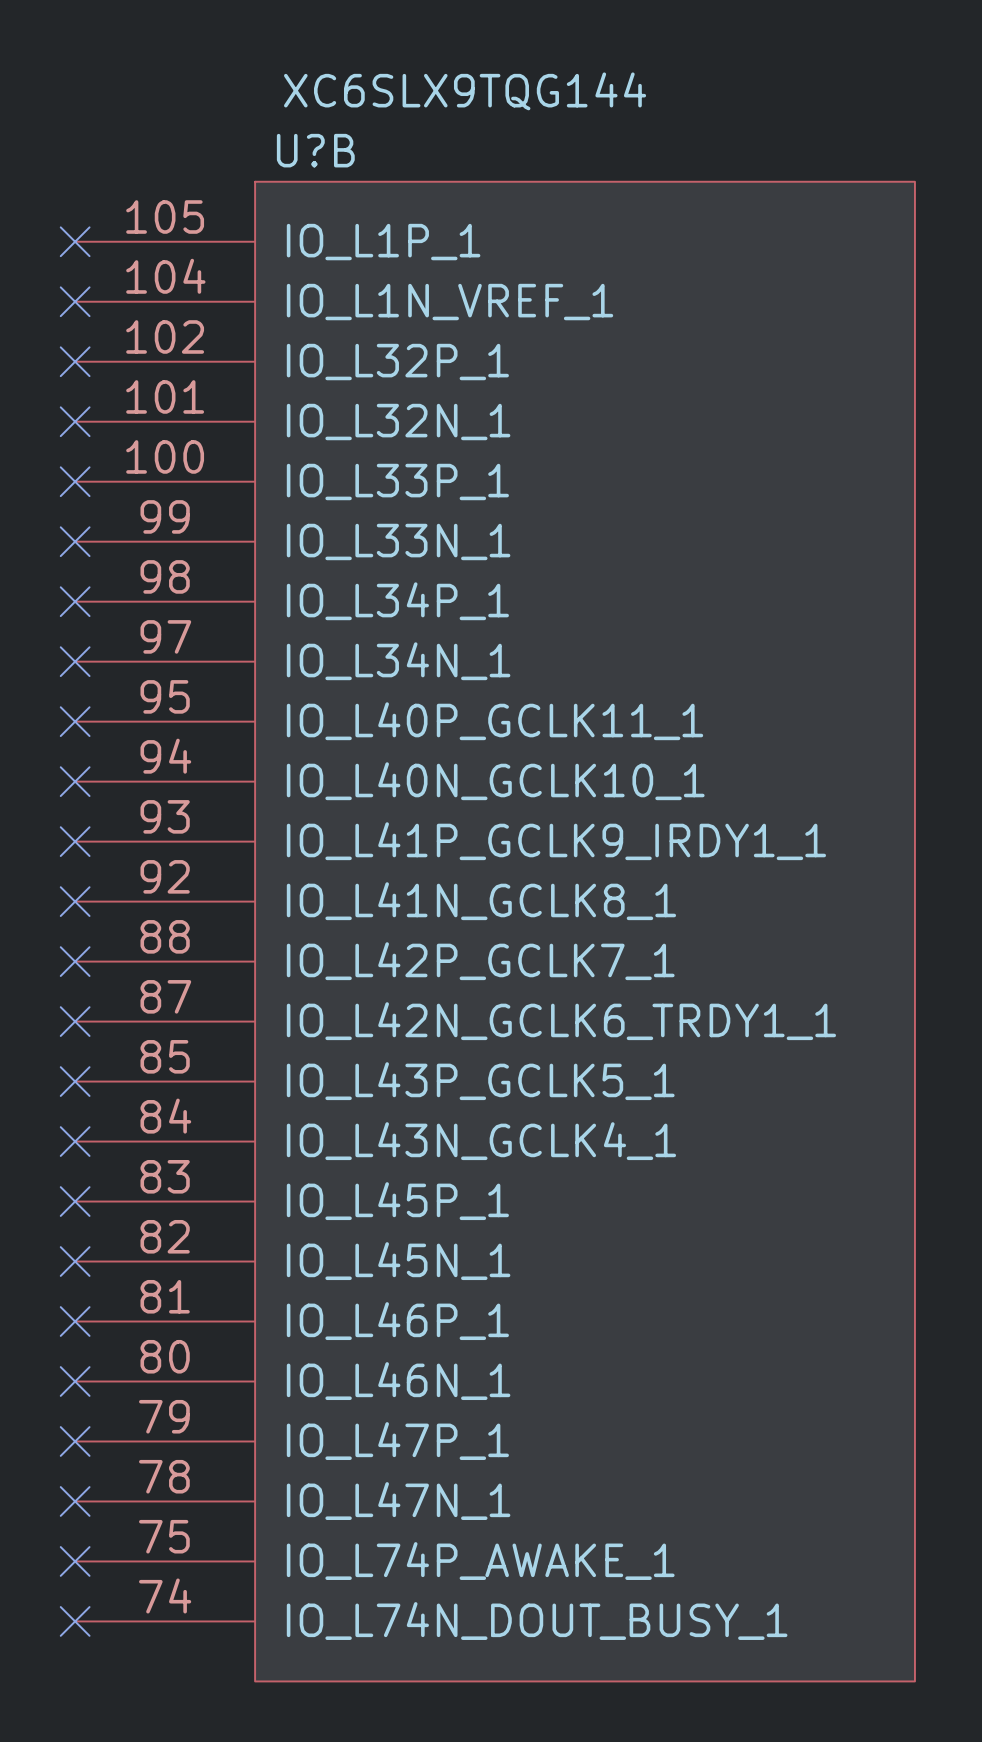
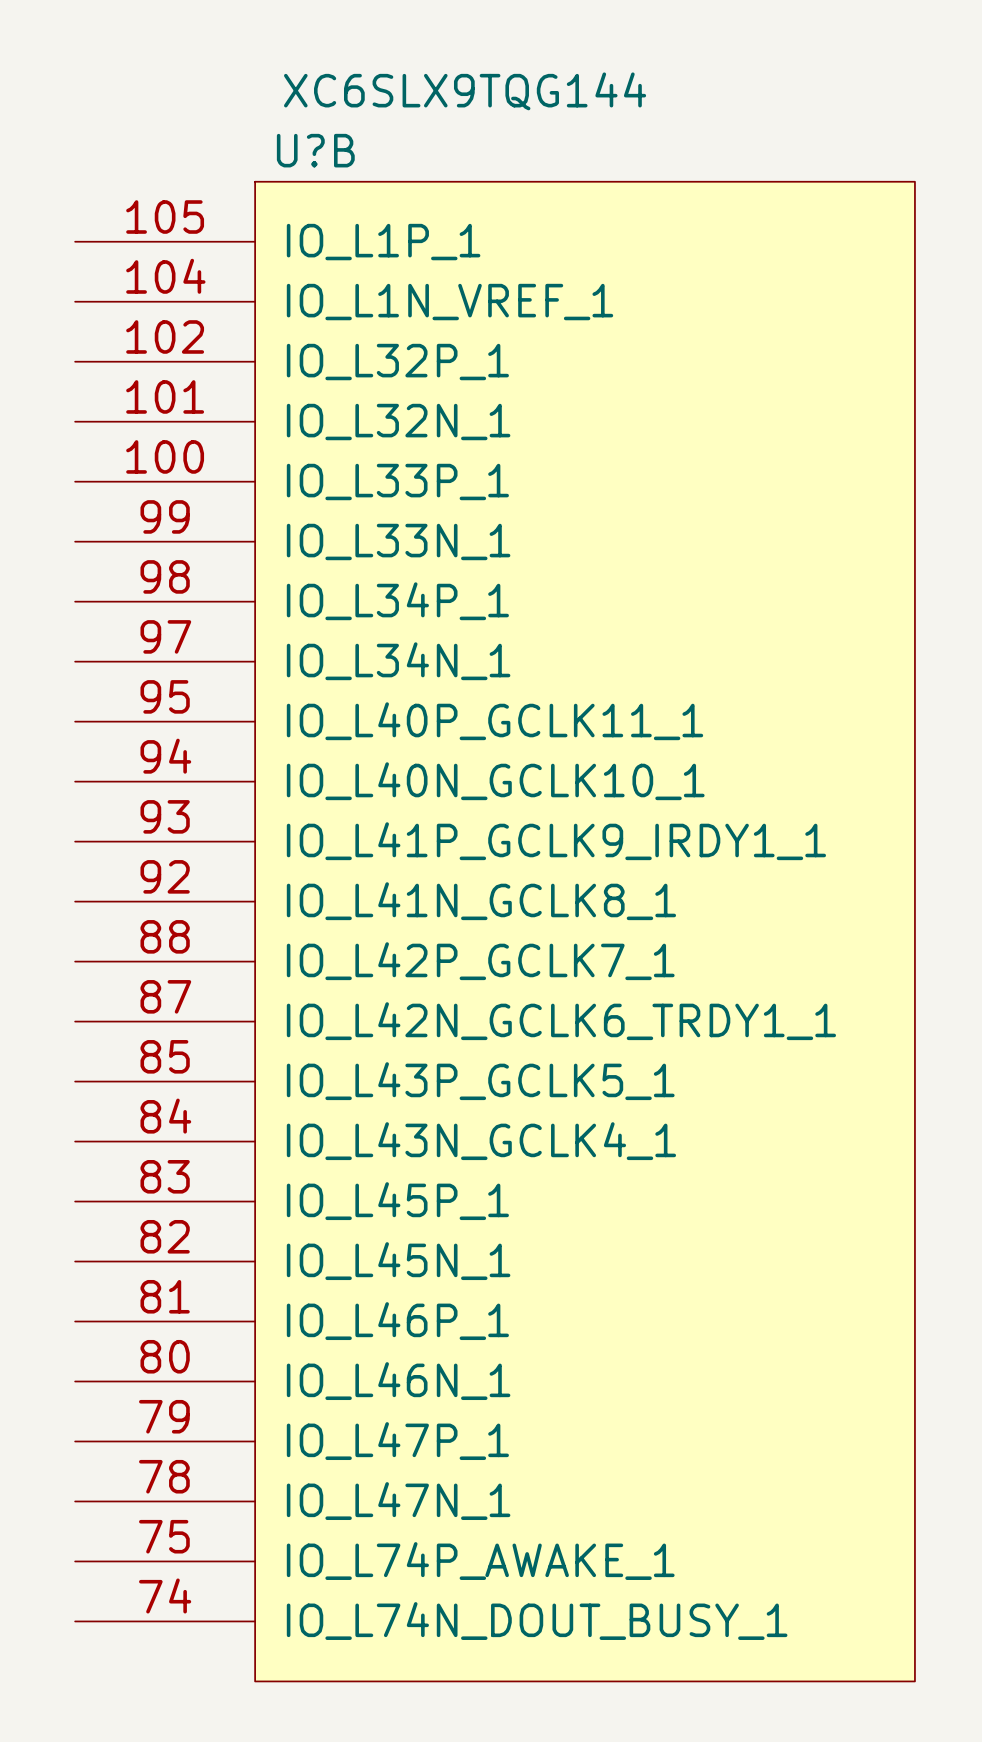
no-connect mark: (75, 241) -> none
no-connect mark: (75, 301) -> none
no-connect mark: (75, 361) -> none
no-connect mark: (75, 421) -> none
no-connect mark: (75, 481) -> none
no-connect mark: (75, 541) -> none
no-connect mark: (75, 601) -> none
no-connect mark: (75, 661) -> none
no-connect mark: (75, 721) -> none
no-connect mark: (75, 781) -> none
no-connect mark: (75, 841) -> none
no-connect mark: (75, 901) -> none
no-connect mark: (75, 961) -> none
no-connect mark: (75, 1021) -> none
no-connect mark: (75, 1081) -> none
no-connect mark: (75, 1141) -> none
no-connect mark: (75, 1201) -> none
no-connect mark: (75, 1261) -> none
no-connect mark: (75, 1321) -> none
no-connect mark: (75, 1381) -> none
no-connect mark: (75, 1441) -> none
no-connect mark: (75, 1501) -> none
no-connect mark: (75, 1561) -> none
no-connect mark: (75, 1621) -> none

